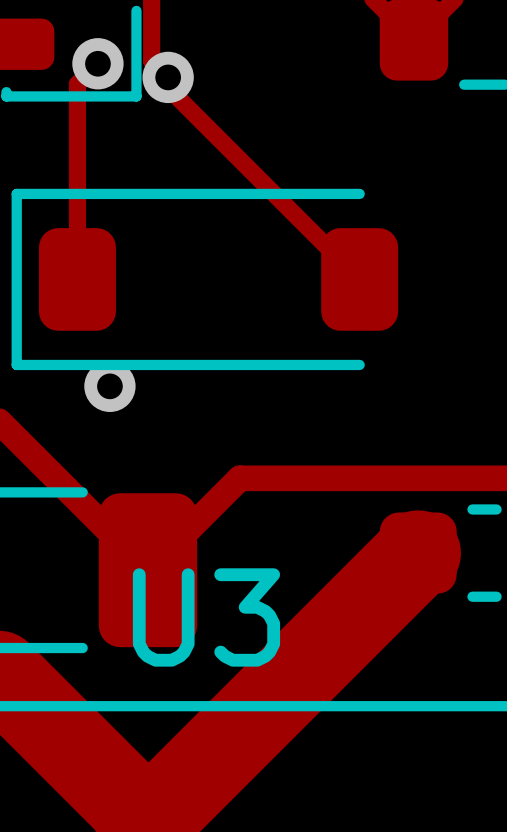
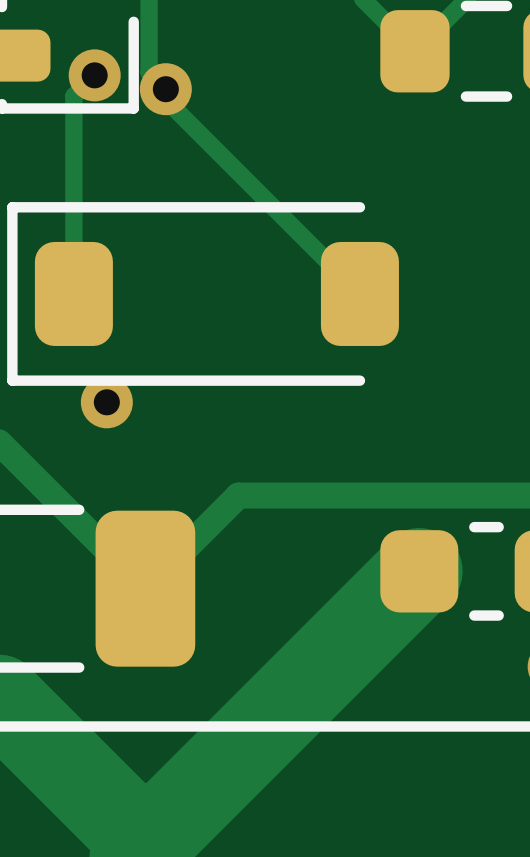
U3 name: U3 (206, 617) -> none

